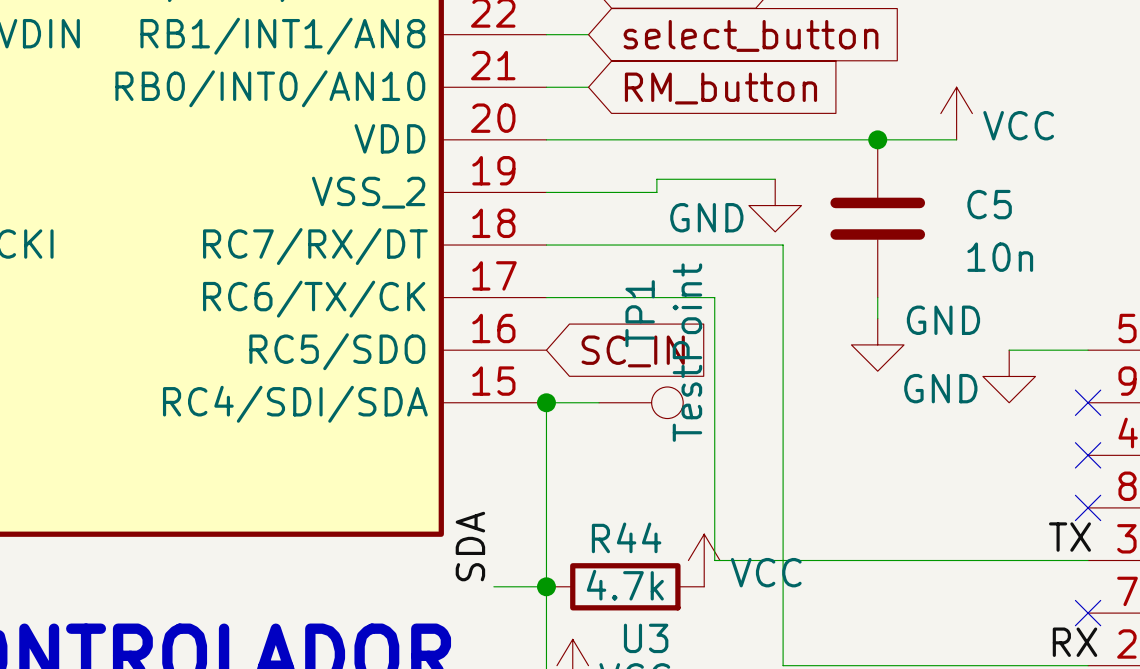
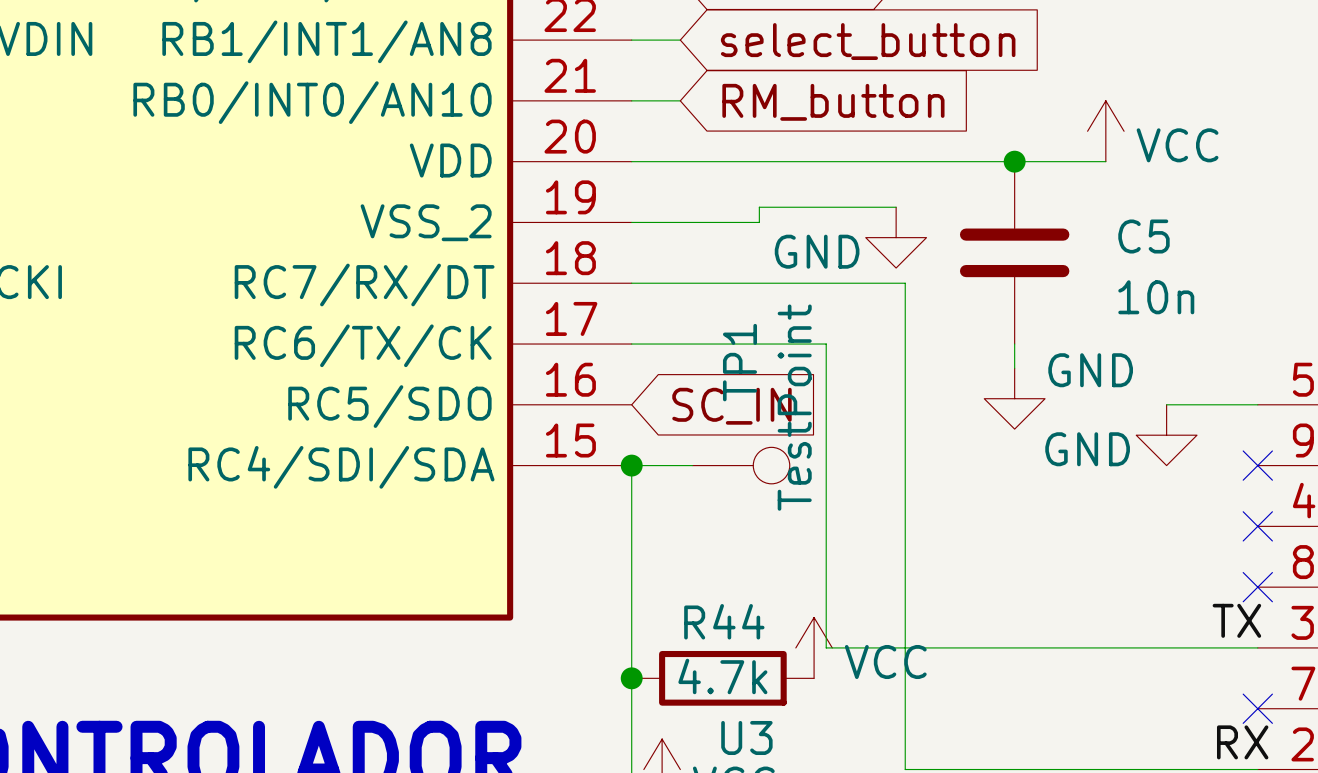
label: SDA (470, 546) -> none
wire: (493, 586) (546, 586) -> none

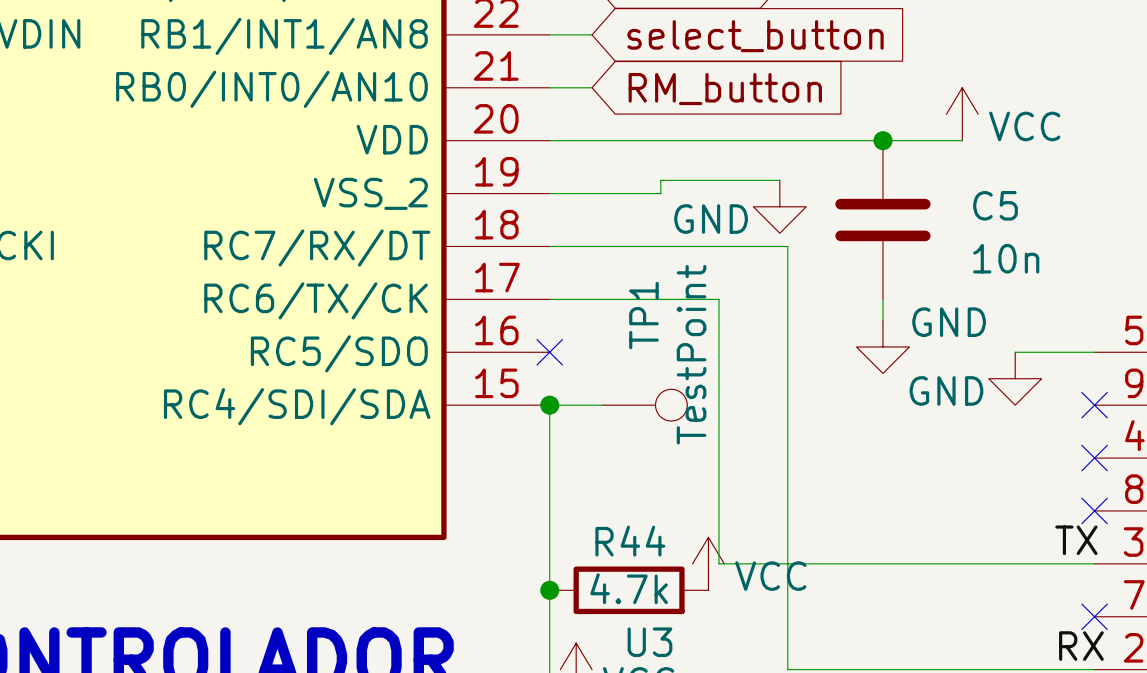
no-connect mark: none -> (549, 352)
global label: SC_IN (731, 406) -> none

